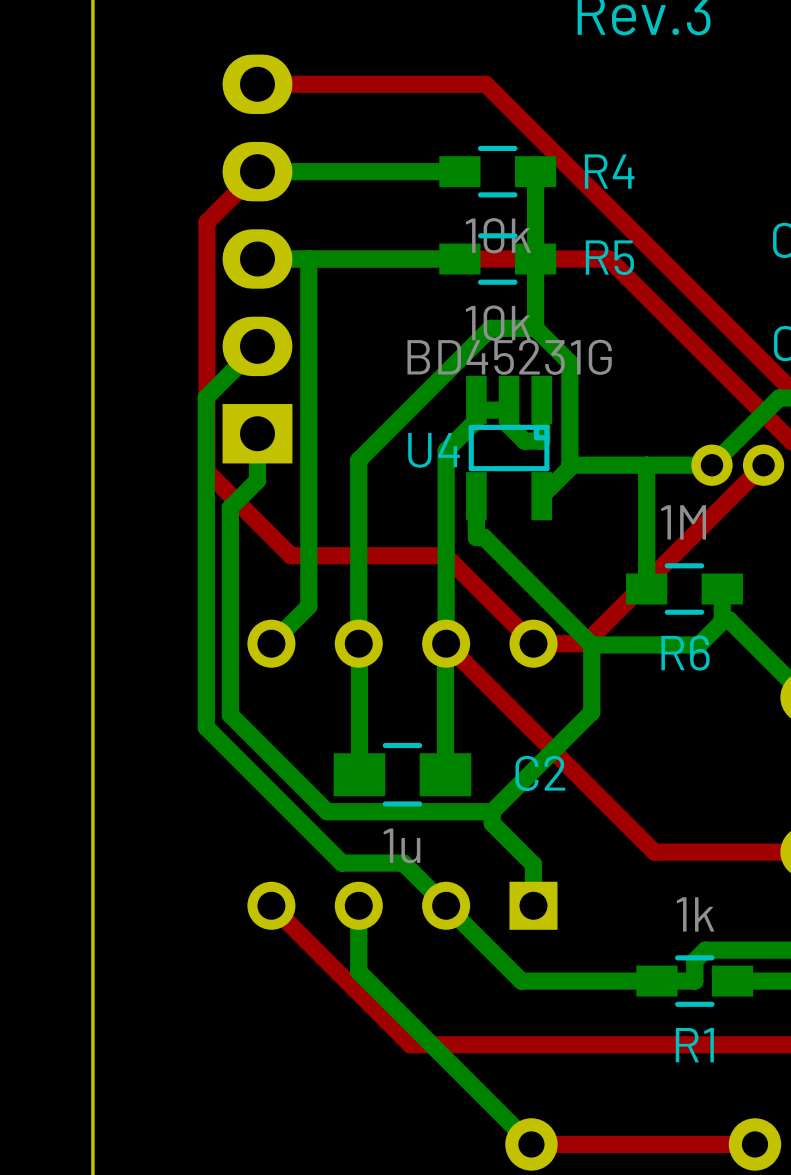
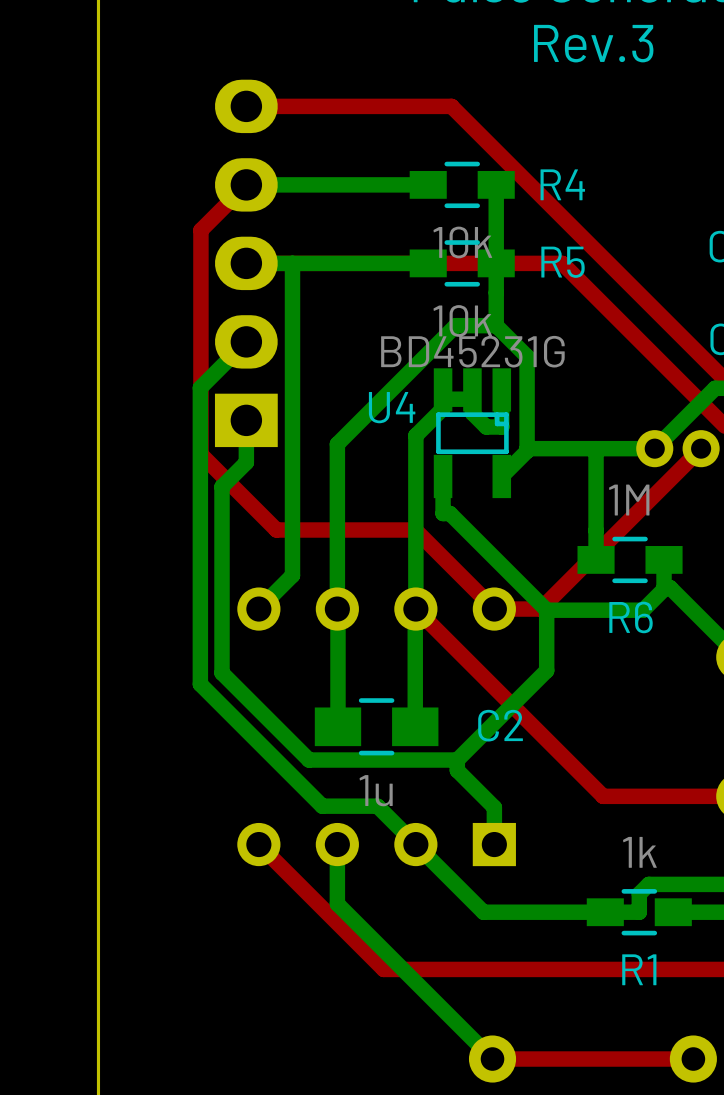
U4 name position: U4 (434, 450) -> U4 (392, 407)

